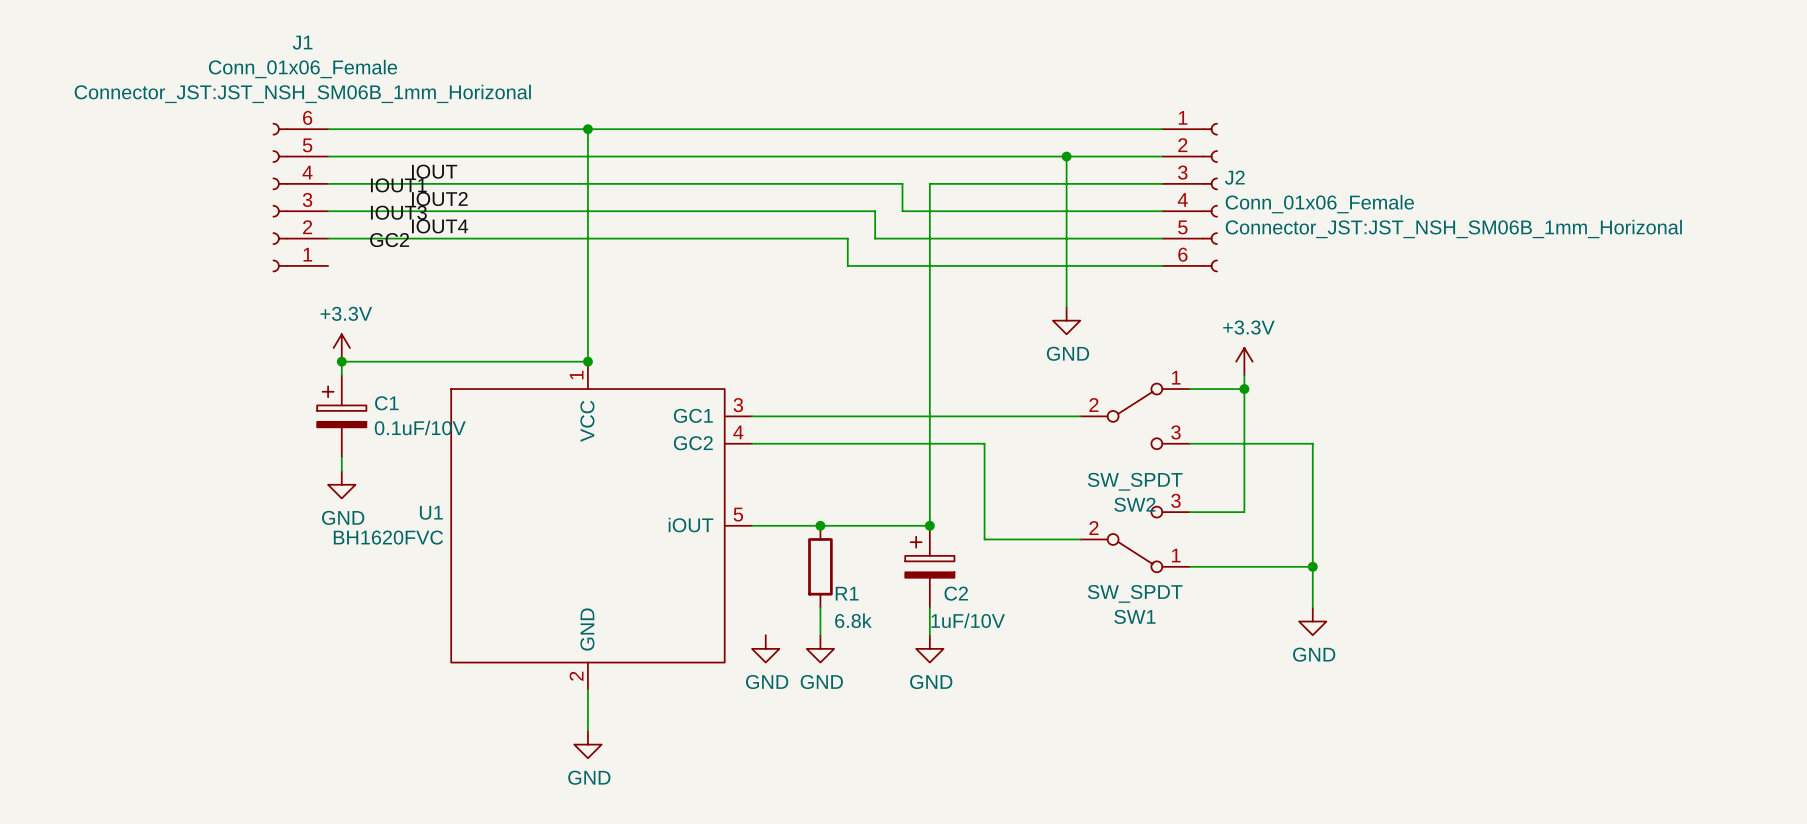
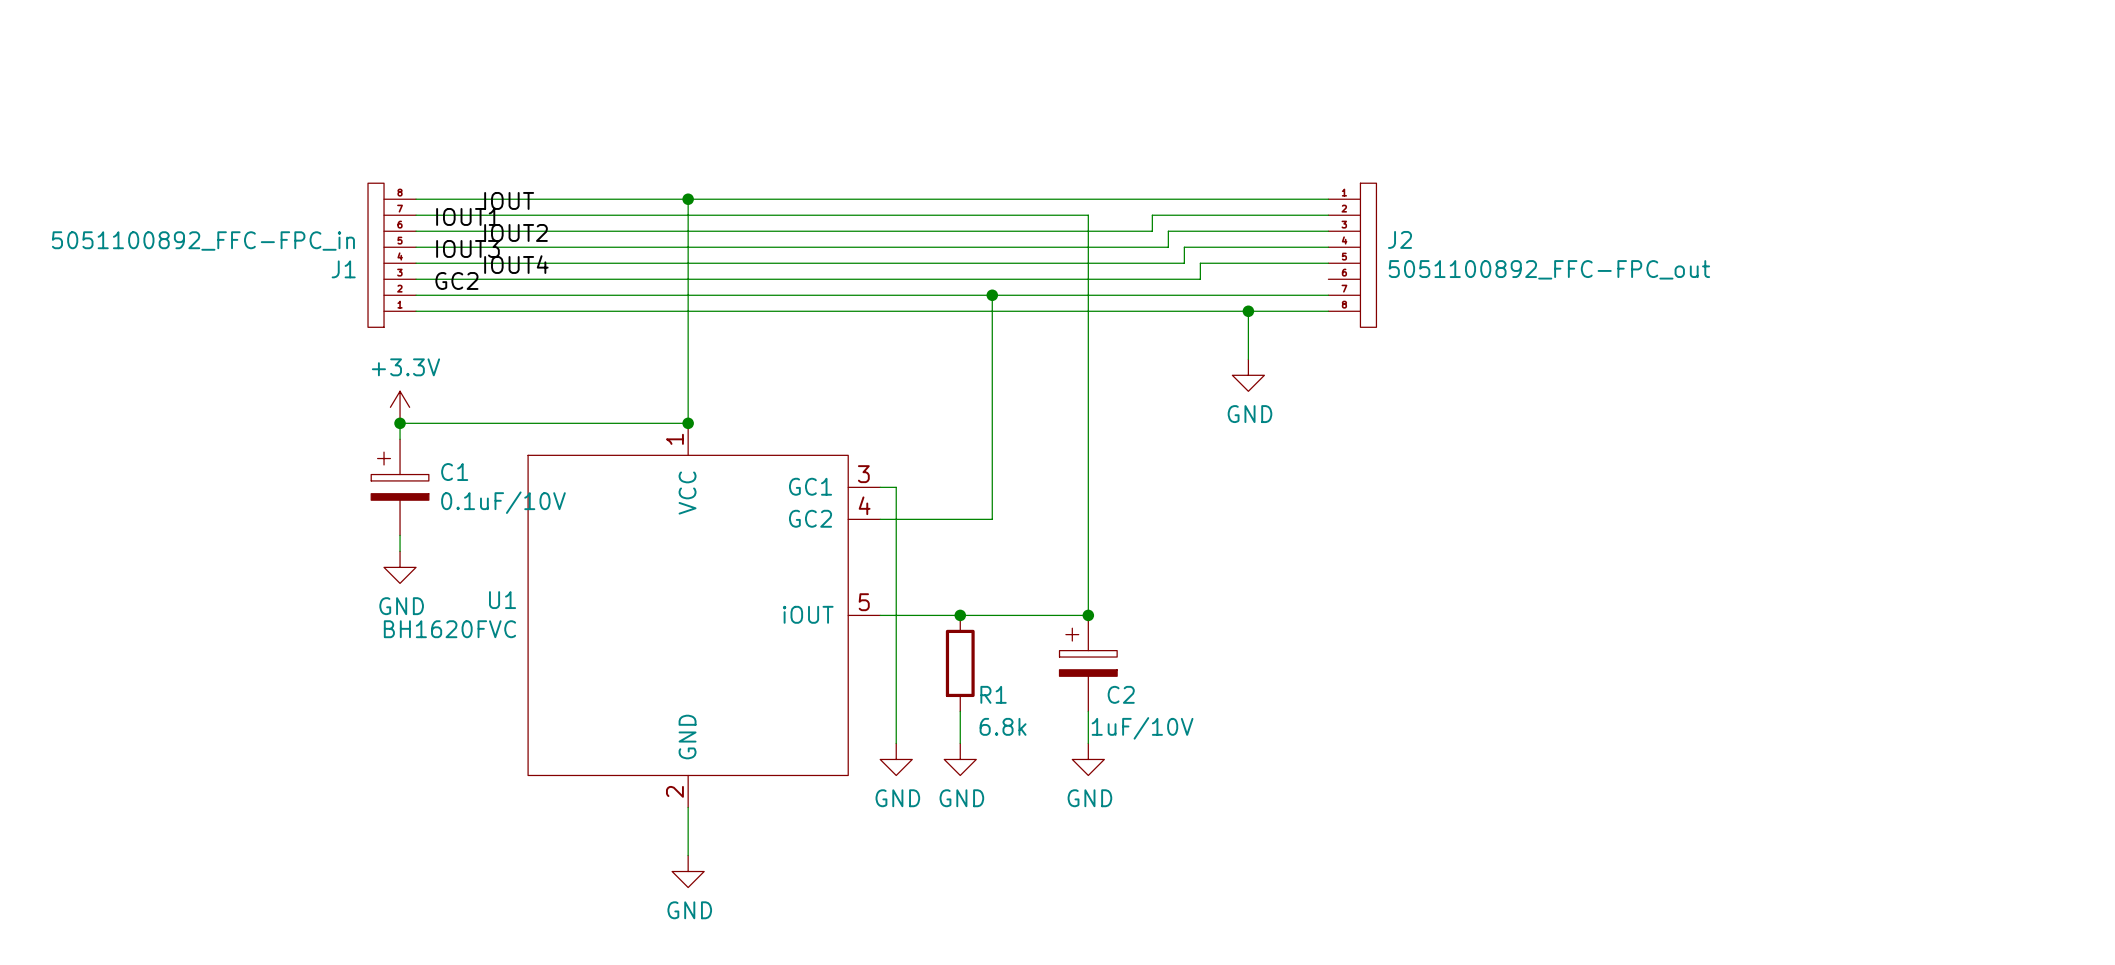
J1 name position: J1 (302, 42) -> J1 (343, 269)
J1 value: Conn_01x06_Female (303, 69) -> 5051100892_FFC-FPC_in (203, 241)
J1 text: Connector_JST:JST_NSH_SM06B_1mm_Horizonal (302, 93) -> none
J1 symbol: [272, 122, 329, 273] -> [368, 183, 417, 328]
J2 symbol: [1162, 122, 1218, 273] -> [1328, 183, 1377, 328]
wire: (328, 129) (1162, 129) -> none
wire: (587, 129) (587, 170) -> none
junction position: (587, 129) -> (688, 199)
wire: (328, 156) (1162, 156) -> none
wire: (1066, 156) (1066, 265) -> none
junction: (1066, 156) -> none
wire: none -> (416, 199) (1328, 199)
wire: (902, 183) (902, 211) -> (1056, 215) (1088, 215)
wire: (929, 183) (984, 183) -> (416, 231) (1152, 231) (1152, 215)
J2 value: Conn_01x06_Female (1319, 204) -> 5051100892_FFC-FPC_out (1549, 269)
wire: (875, 211) (875, 238) -> (1024, 247) (1056, 247)
wire: (998, 211) (1011, 211) -> (1168, 247) (1168, 231) (1328, 231)
wire: none -> (1184, 247) (1184, 263) (416, 263)
J2 text: Connector_JST:JST_NSH_SM06B_1mm_Horizonal (1453, 229) -> none
wire: (847, 238) (847, 252) -> (992, 279) (1024, 279)
wire: (1025, 238) (1162, 238) -> (1200, 279) (1200, 263) (1328, 263)
wire: none -> (416, 295) (1328, 295)
junction: none -> (992, 295)
junction: none -> (1248, 311)
power symbol: +3.3V (1244, 361) -> none
wire: (1244, 375) (1244, 512) (1189, 512) -> none
wire: (1189, 389) (1244, 389) -> none
junction: (1244, 389) -> none
wire: (765, 416) (1080, 416) -> (896, 487) (896, 743)
SW2: SW_SPDT (1134, 416) -> none
wire: (847, 443) (984, 443) (984, 539) (1080, 539) -> (992, 519) (992, 311) (416, 311)
wire: (1189, 443) (1312, 443) (1312, 607) -> none
SW1: SW_SPDT (1134, 539) -> none
wire: (1189, 566) (1312, 566) -> none
junction: (1312, 566) -> none
power symbol: GND (1312, 621) -> none

